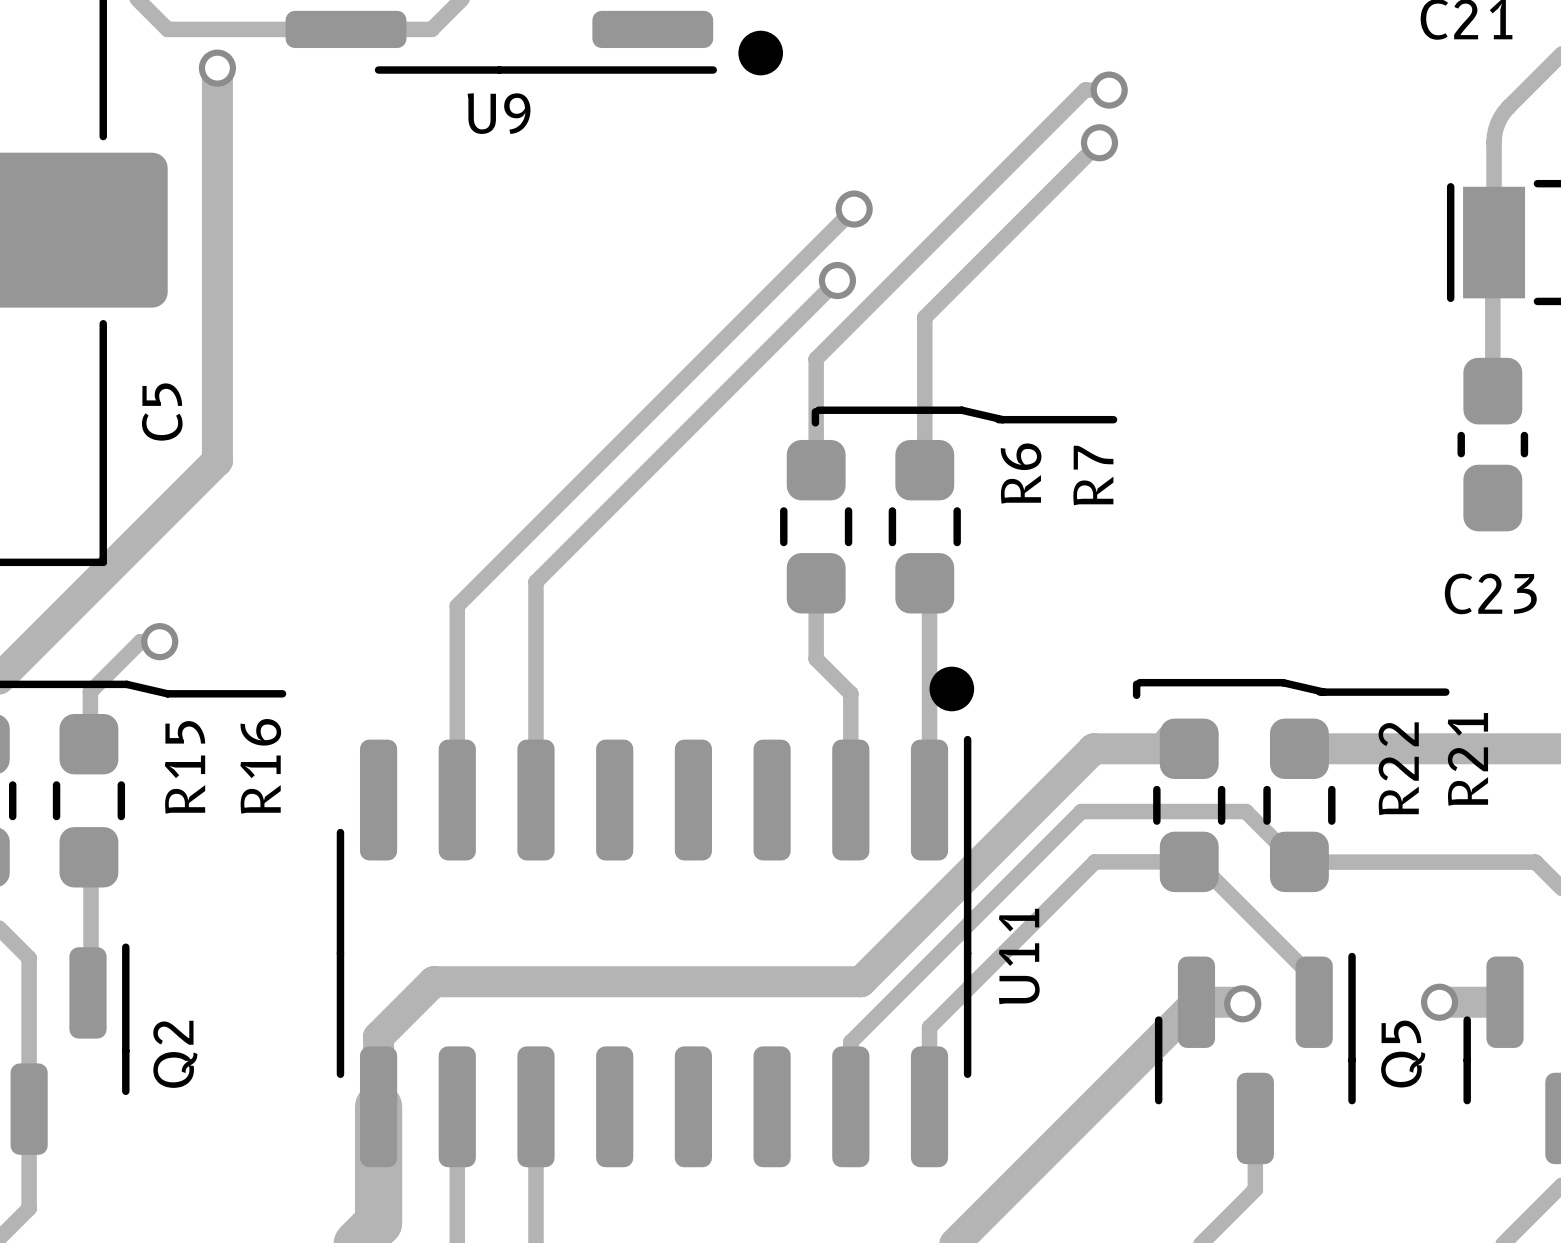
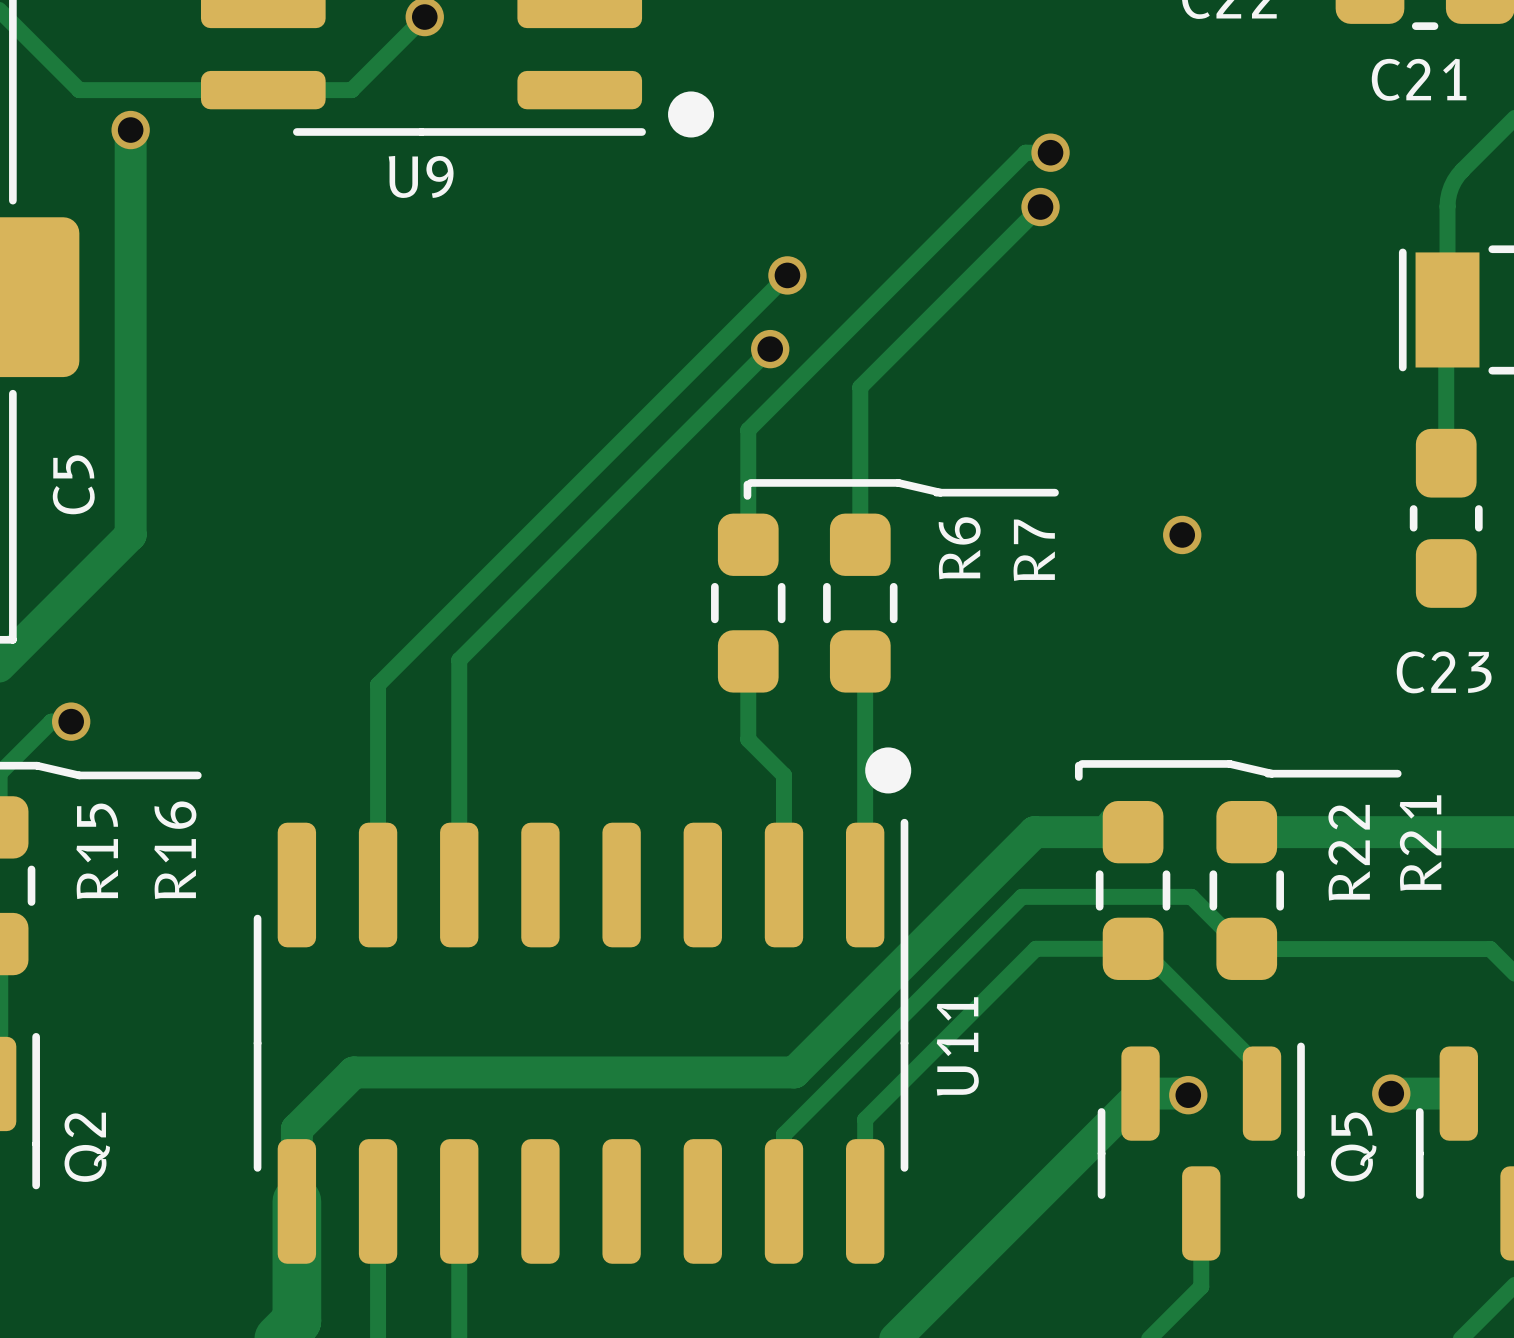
via: none -> (1182, 534)

